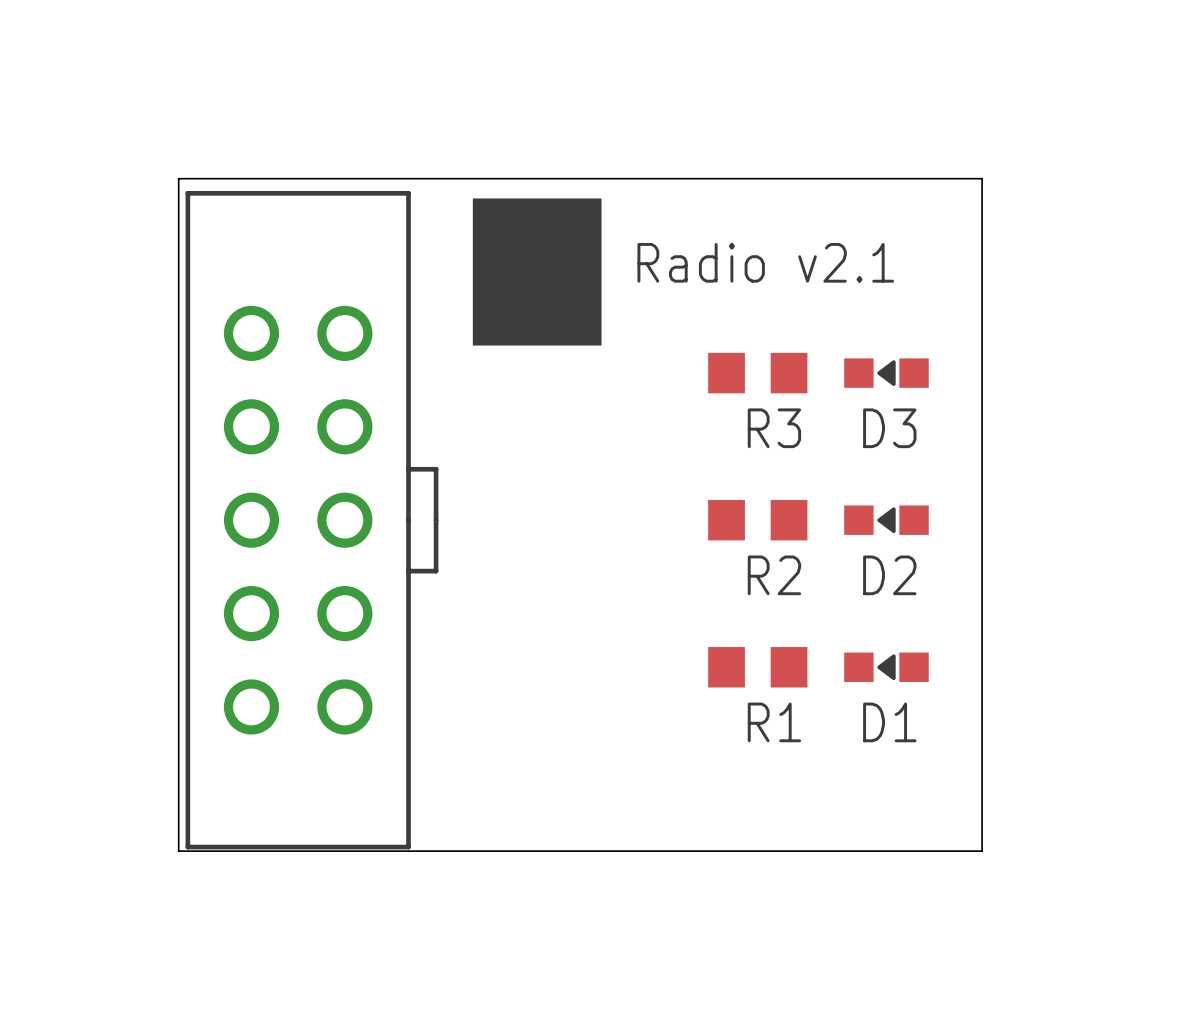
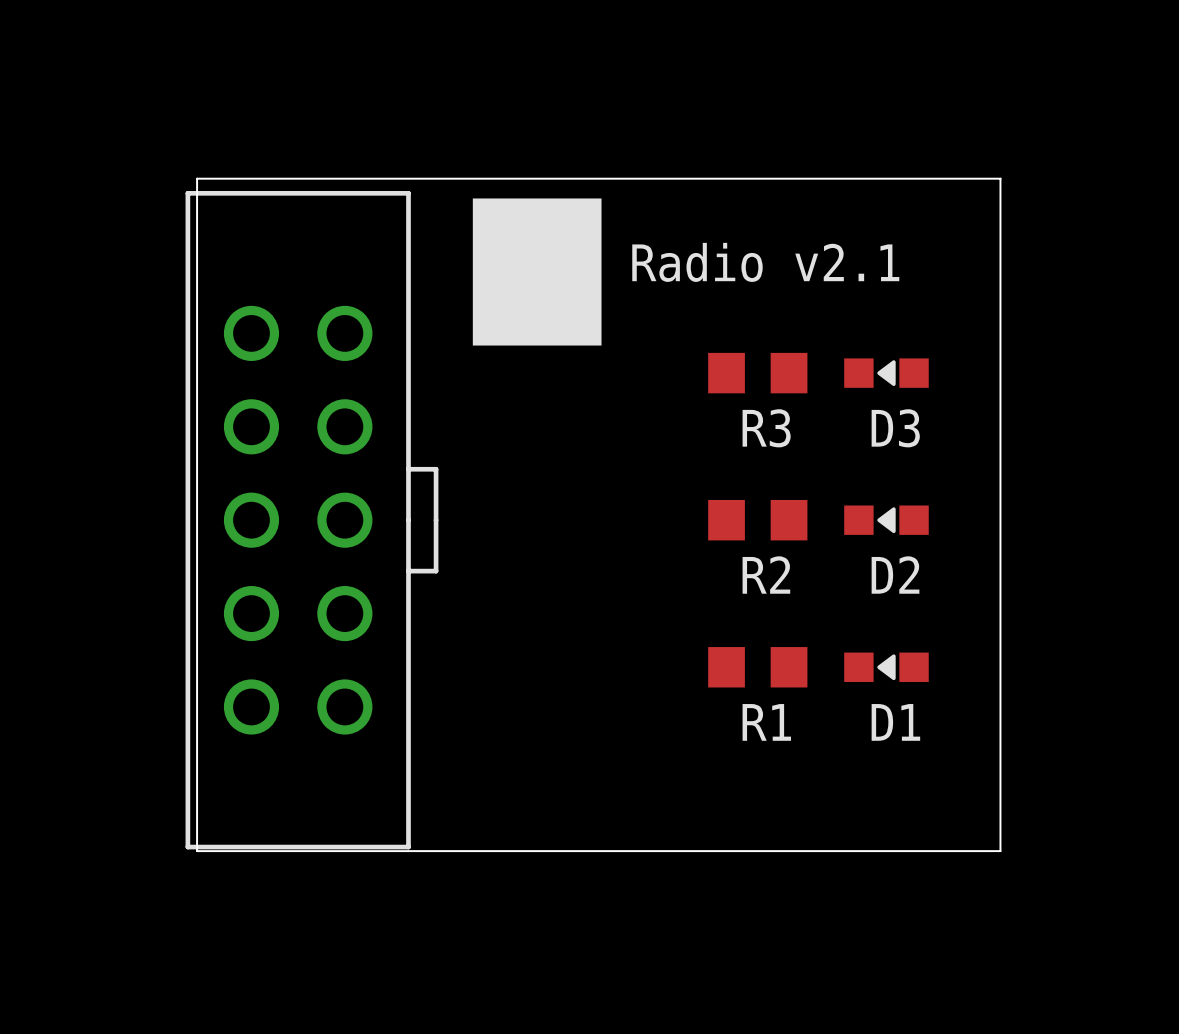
board edge: (197, 178) (178, 178) (178, 851) (197, 851) -> (197, 178) (197, 851)
board edge: (982, 178) (982, 851) -> (982, 178) (1000, 178) (1000, 851) (982, 851)

